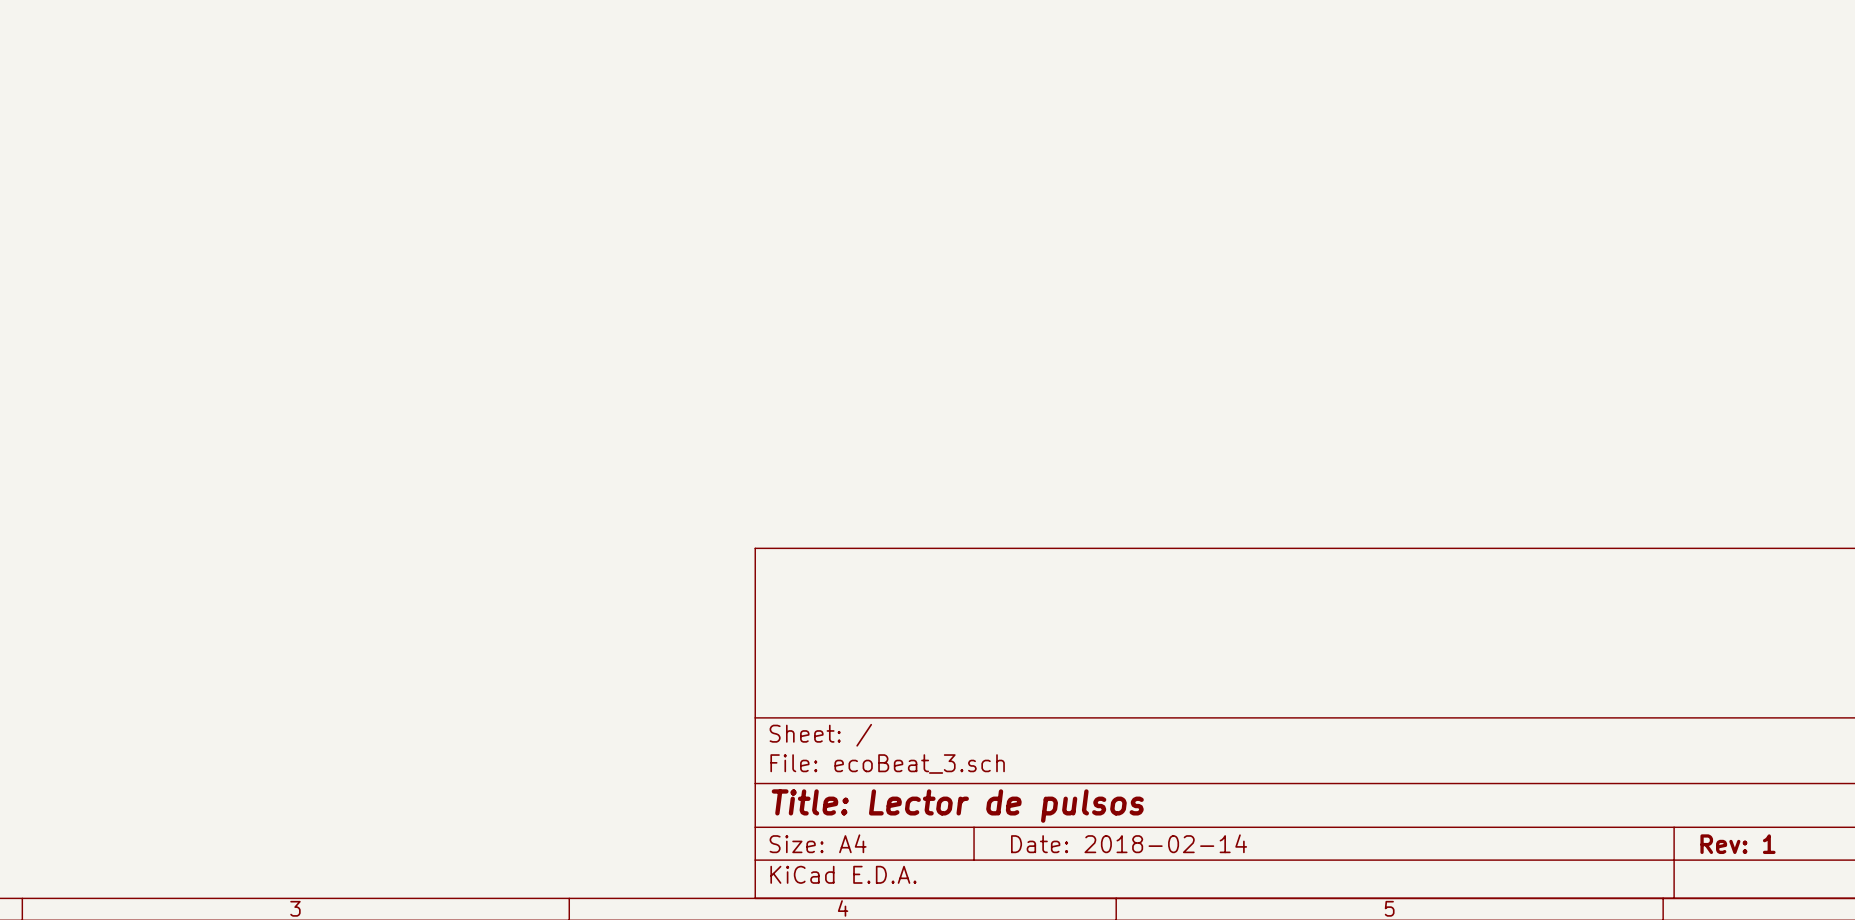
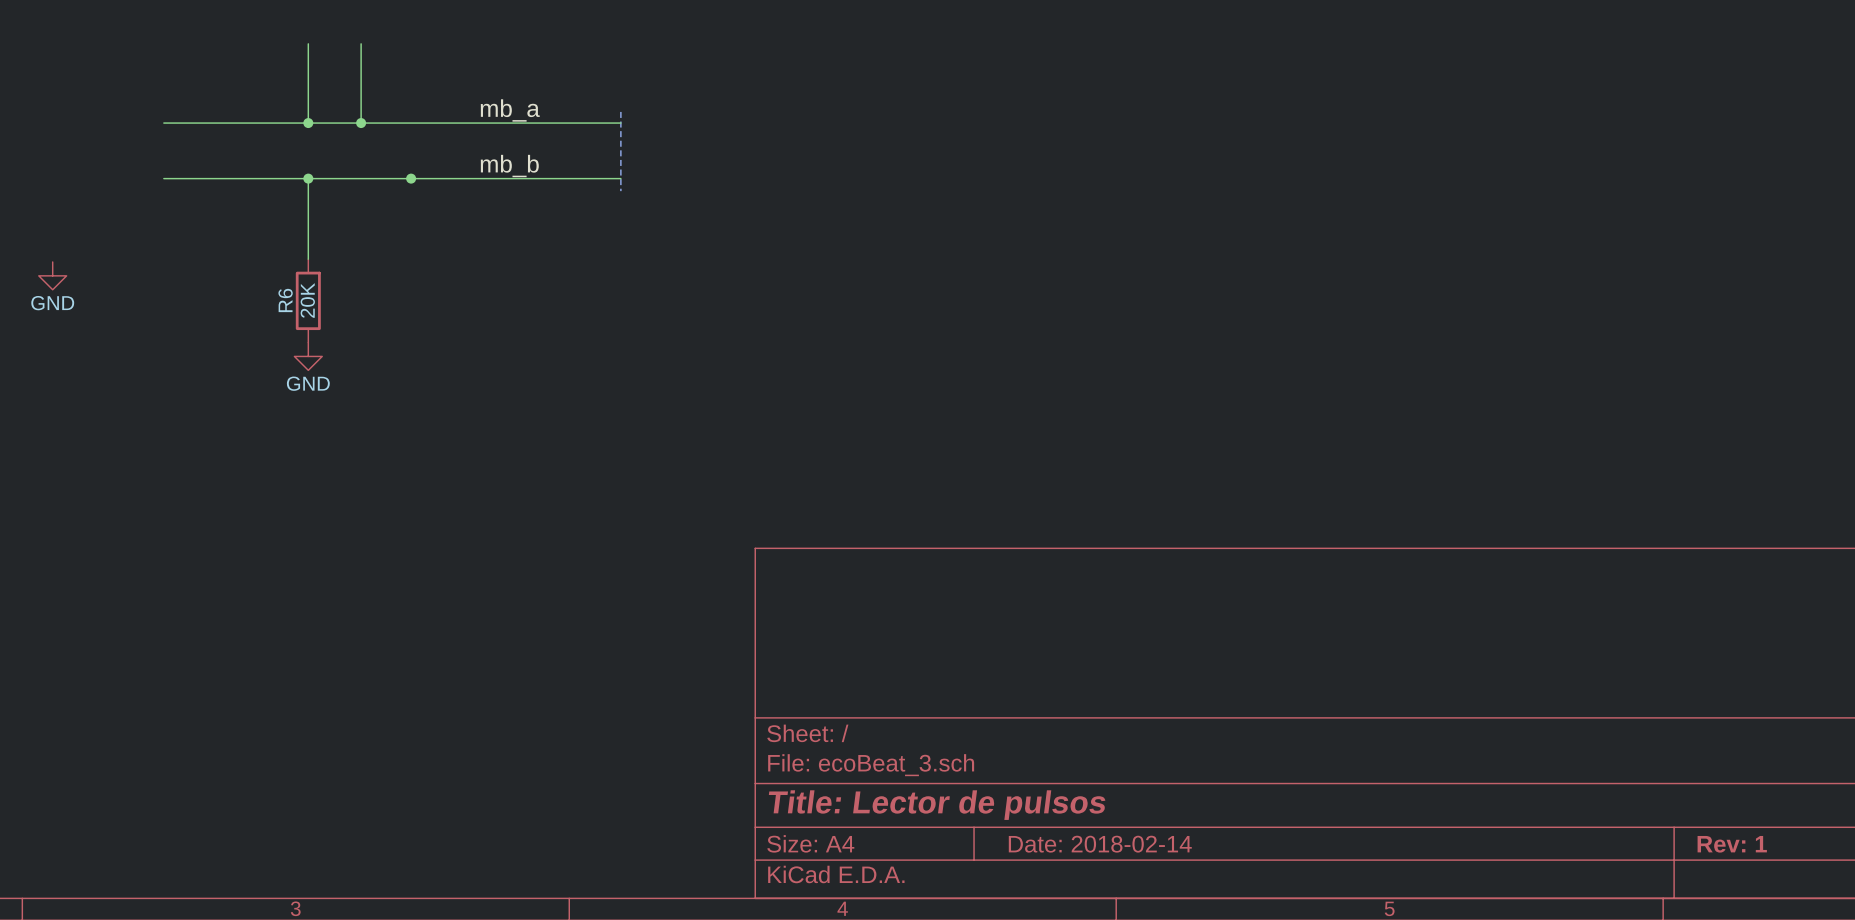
wire: none -> (308, 43) (308, 123)
wire: none -> (361, 43) (361, 123)
label: none -> mb_a (510, 110)
line: none -> (620, 111) (620, 191)
wire: none -> (163, 123) (620, 123)
junction: none -> (308, 123)
junction: none -> (361, 123)
label: none -> mb_b (509, 166)
wire: none -> (163, 178) (620, 178)
wire: none -> (308, 178) (308, 259)
junction: none -> (308, 178)
junction: none -> (411, 178)
power symbol: none -> GND (52, 275)
R6: none -> 20K (308, 300)
power symbol: none -> GND (308, 356)

